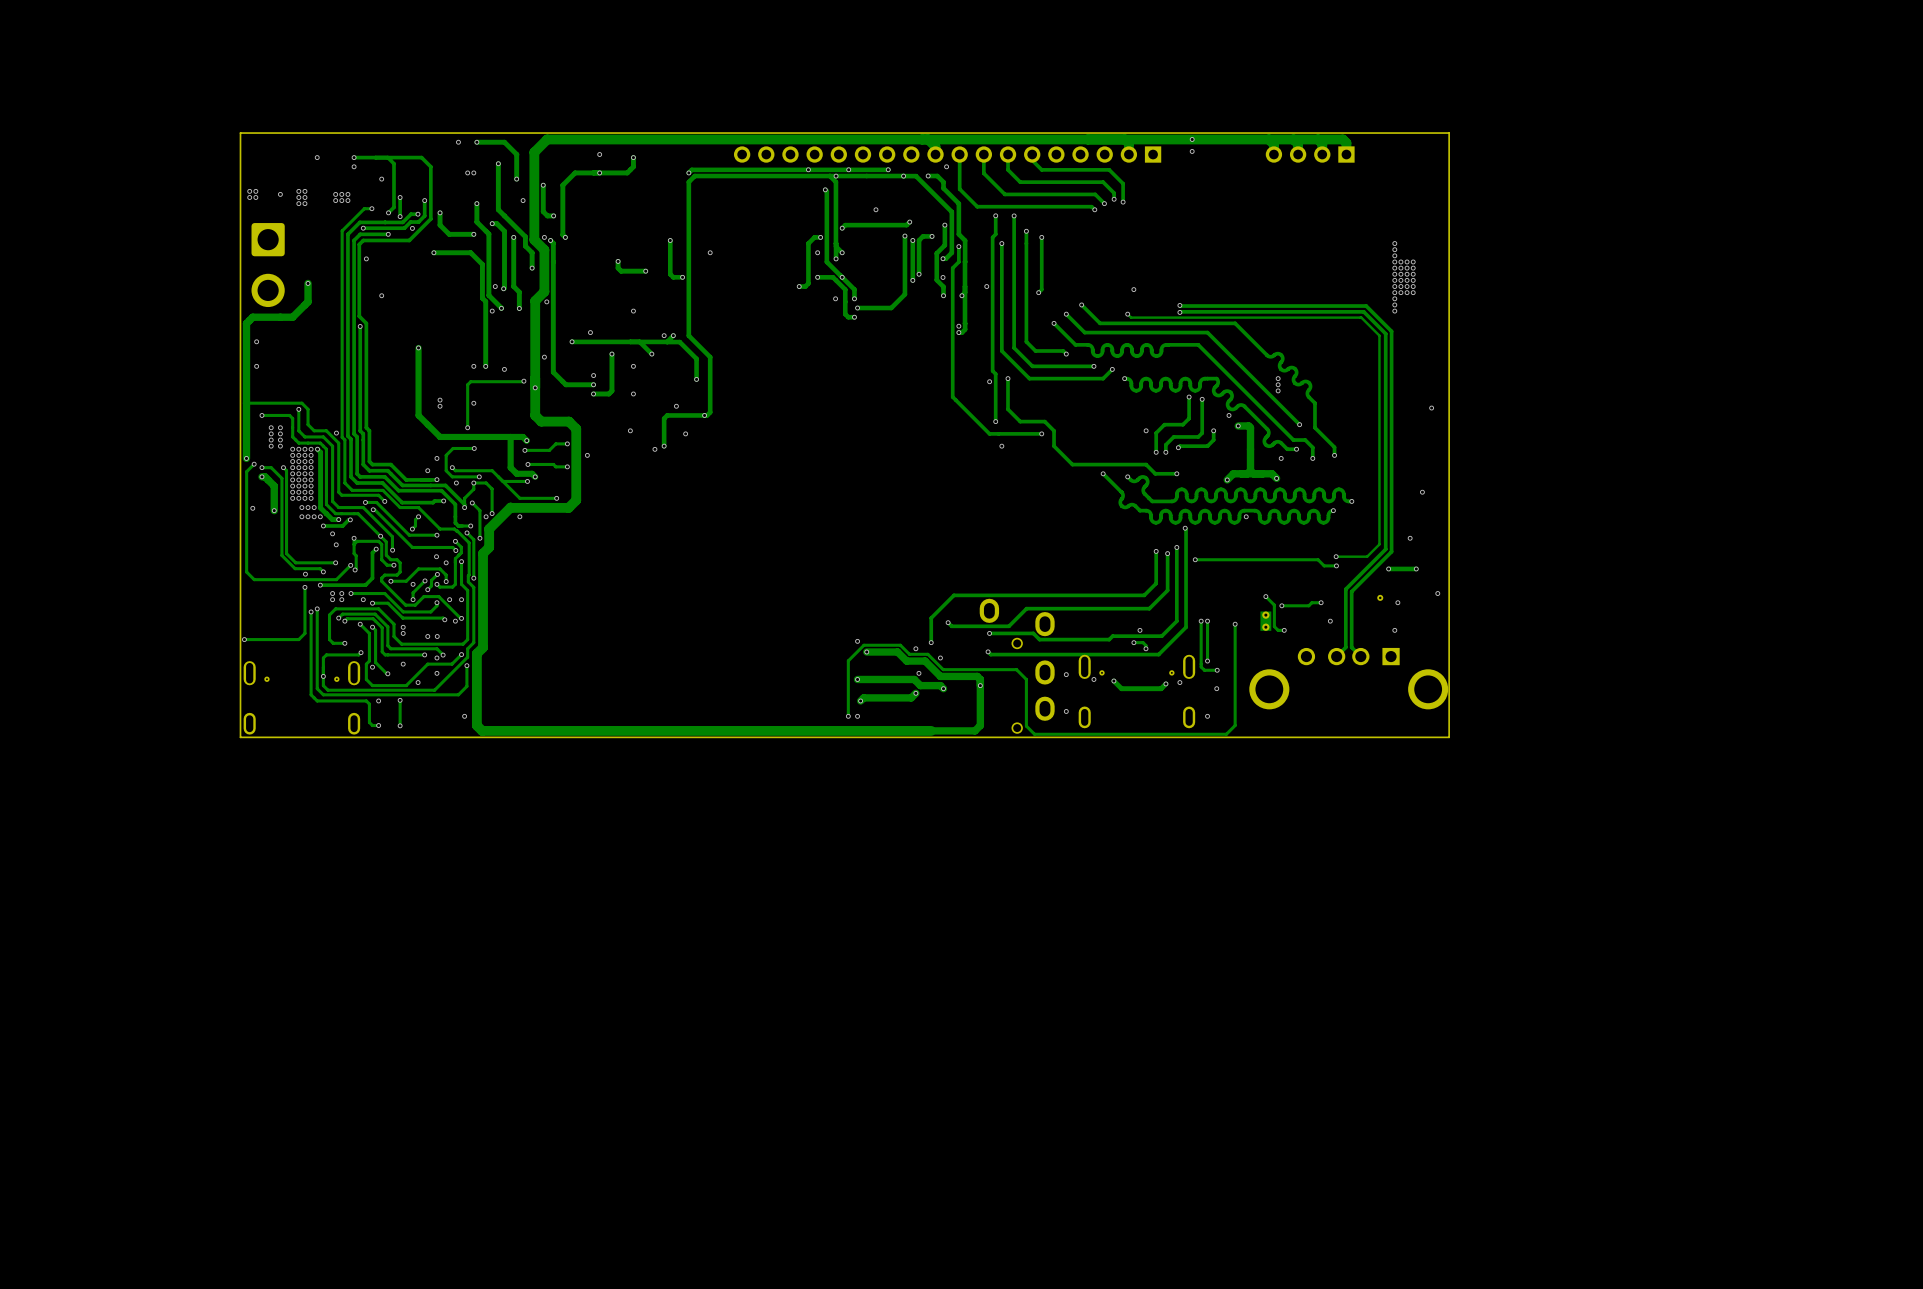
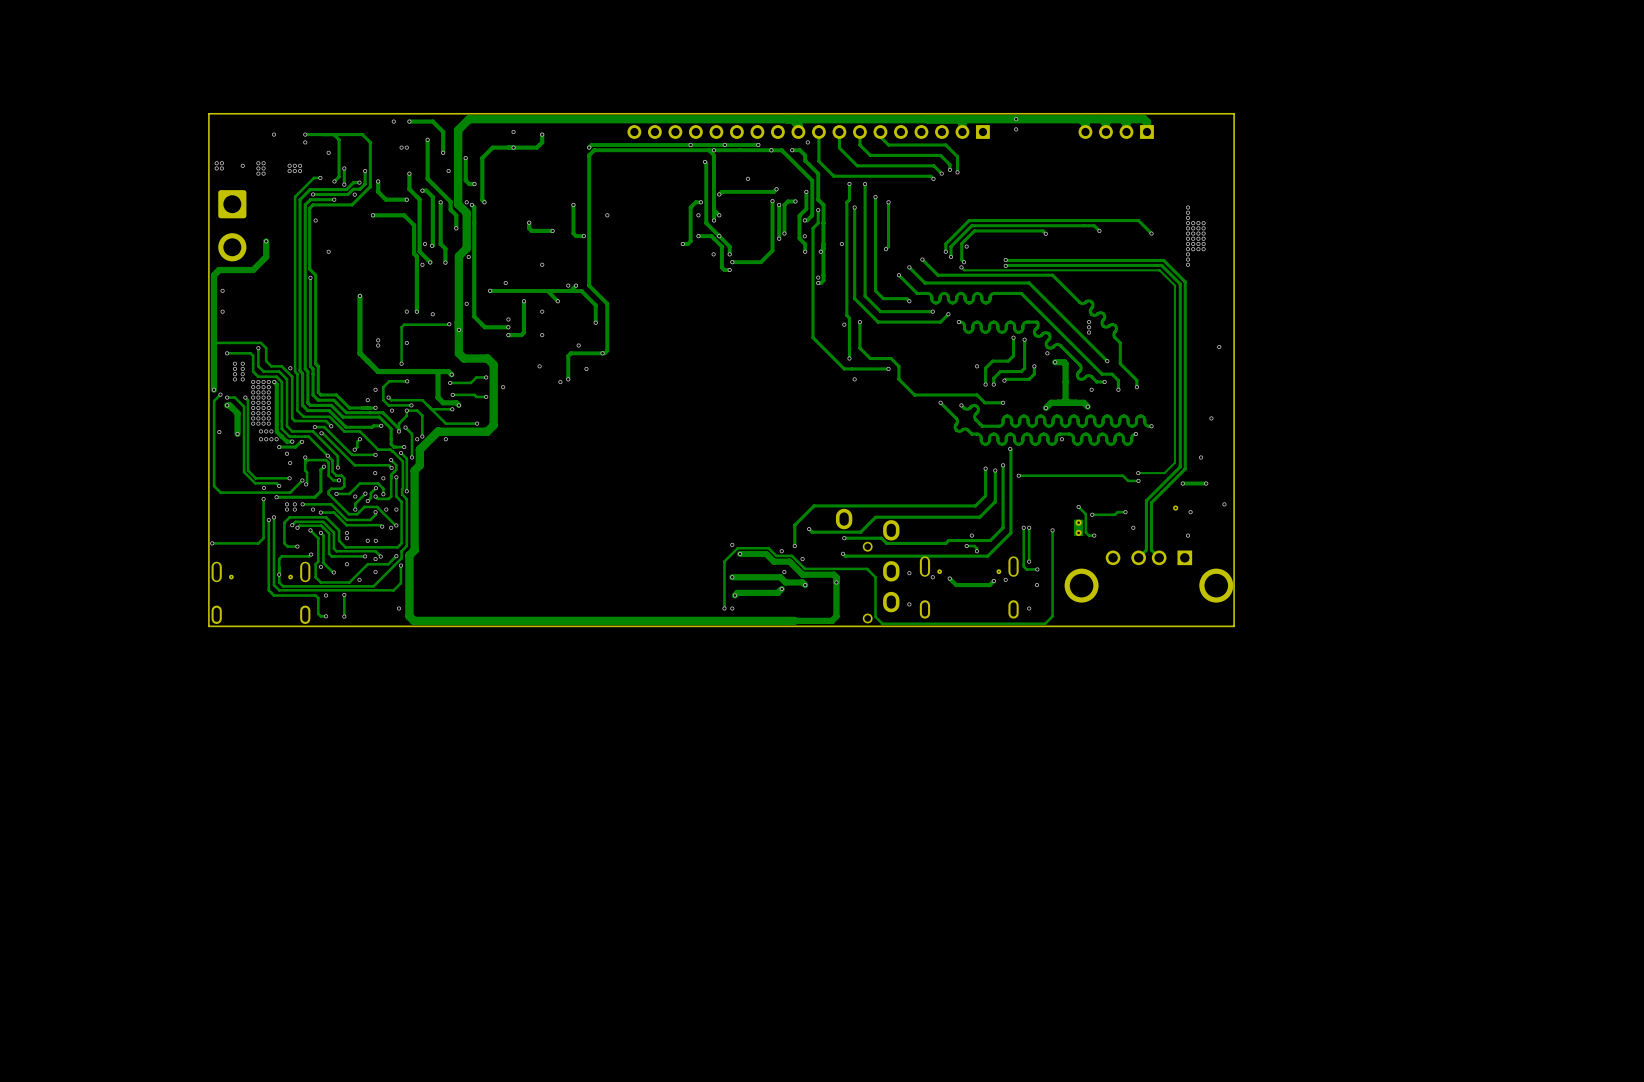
track: none -> (1099, 230) (1094, 225) (971, 225) (951, 246) (951, 256)
via: none -> (1099, 230)
track: none -> (1045, 233) (1042, 230) (974, 230) (961, 243) (961, 259) (964, 262)
via: none -> (1045, 233)
track: none -> (1151, 233) (1138, 220) (969, 220) (945, 243) (945, 251)
via: none -> (1151, 233)
via: none -> (945, 251)
via: none -> (951, 256)
via: none -> (964, 262)

